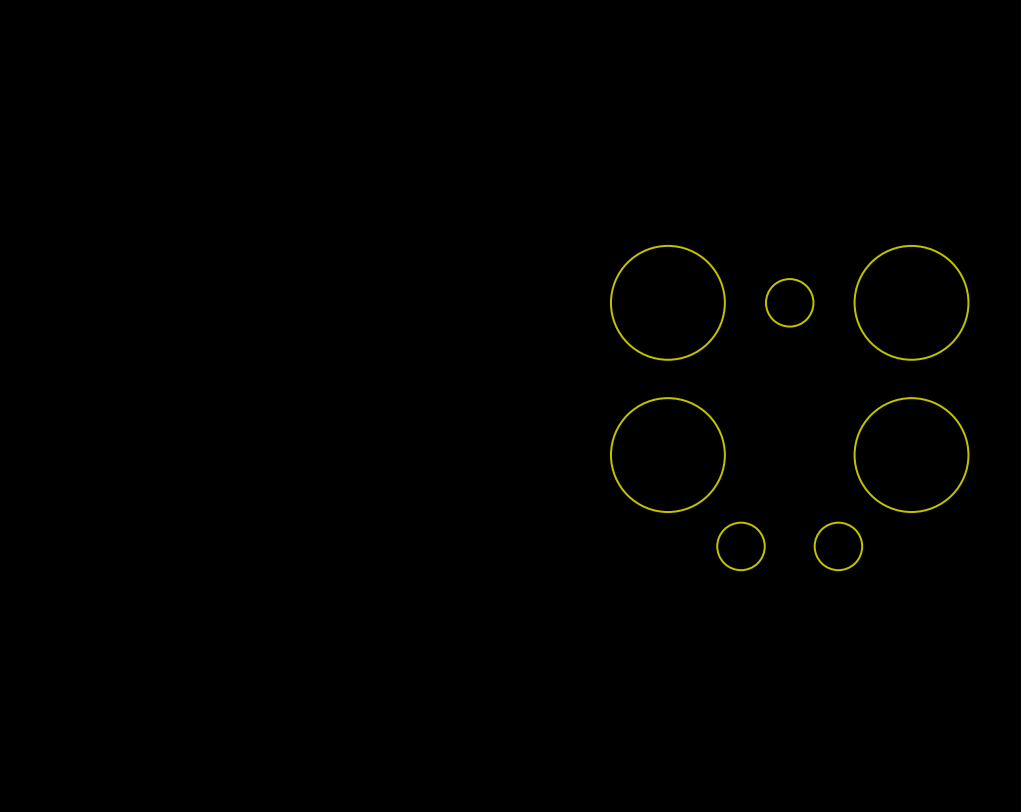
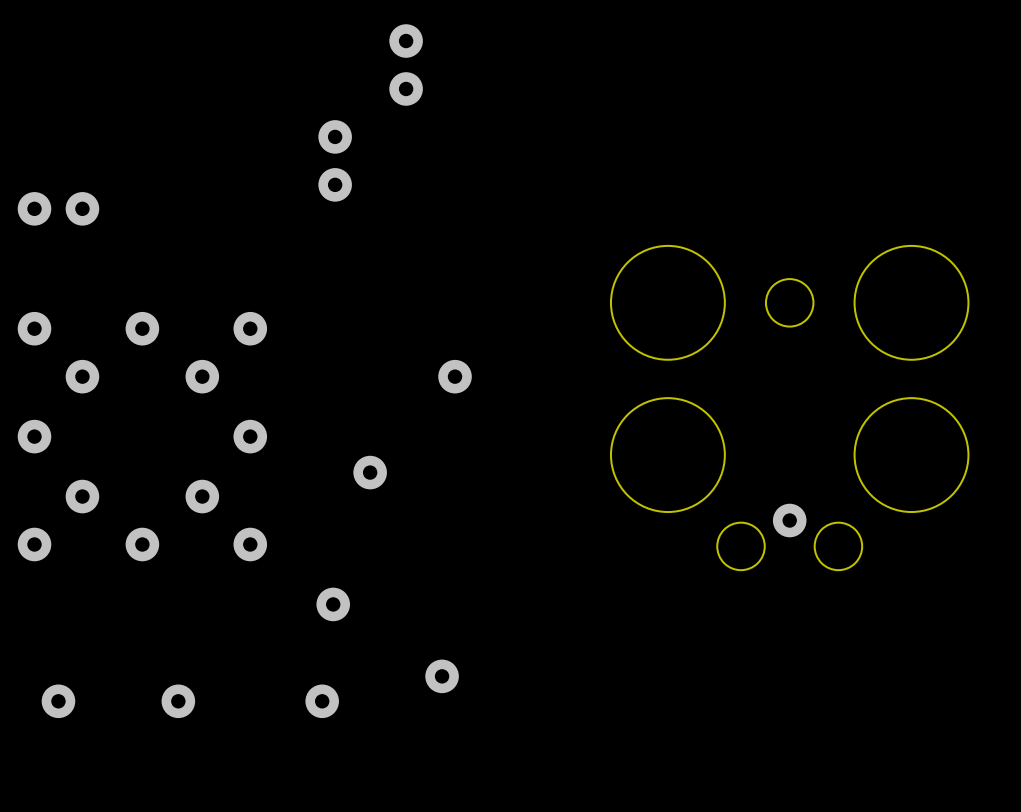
via: none -> (406, 41)
via: none -> (406, 88)
via: none -> (335, 136)
via: none -> (335, 184)
via: none -> (34, 208)
via: none -> (82, 208)
via: none -> (34, 328)
via: none -> (142, 328)
via: none -> (250, 328)
via: none -> (82, 376)
via: none -> (202, 376)
via: none -> (455, 376)
via: none -> (34, 436)
via: none -> (250, 436)
via: none -> (370, 472)
via: none -> (82, 496)
via: none -> (202, 496)
via: none -> (789, 520)
via: none -> (34, 544)
via: none -> (142, 544)
via: none -> (250, 544)
via: none -> (333, 604)
via: none -> (442, 676)
via: none -> (58, 701)
via: none -> (178, 701)
via: none -> (322, 701)

